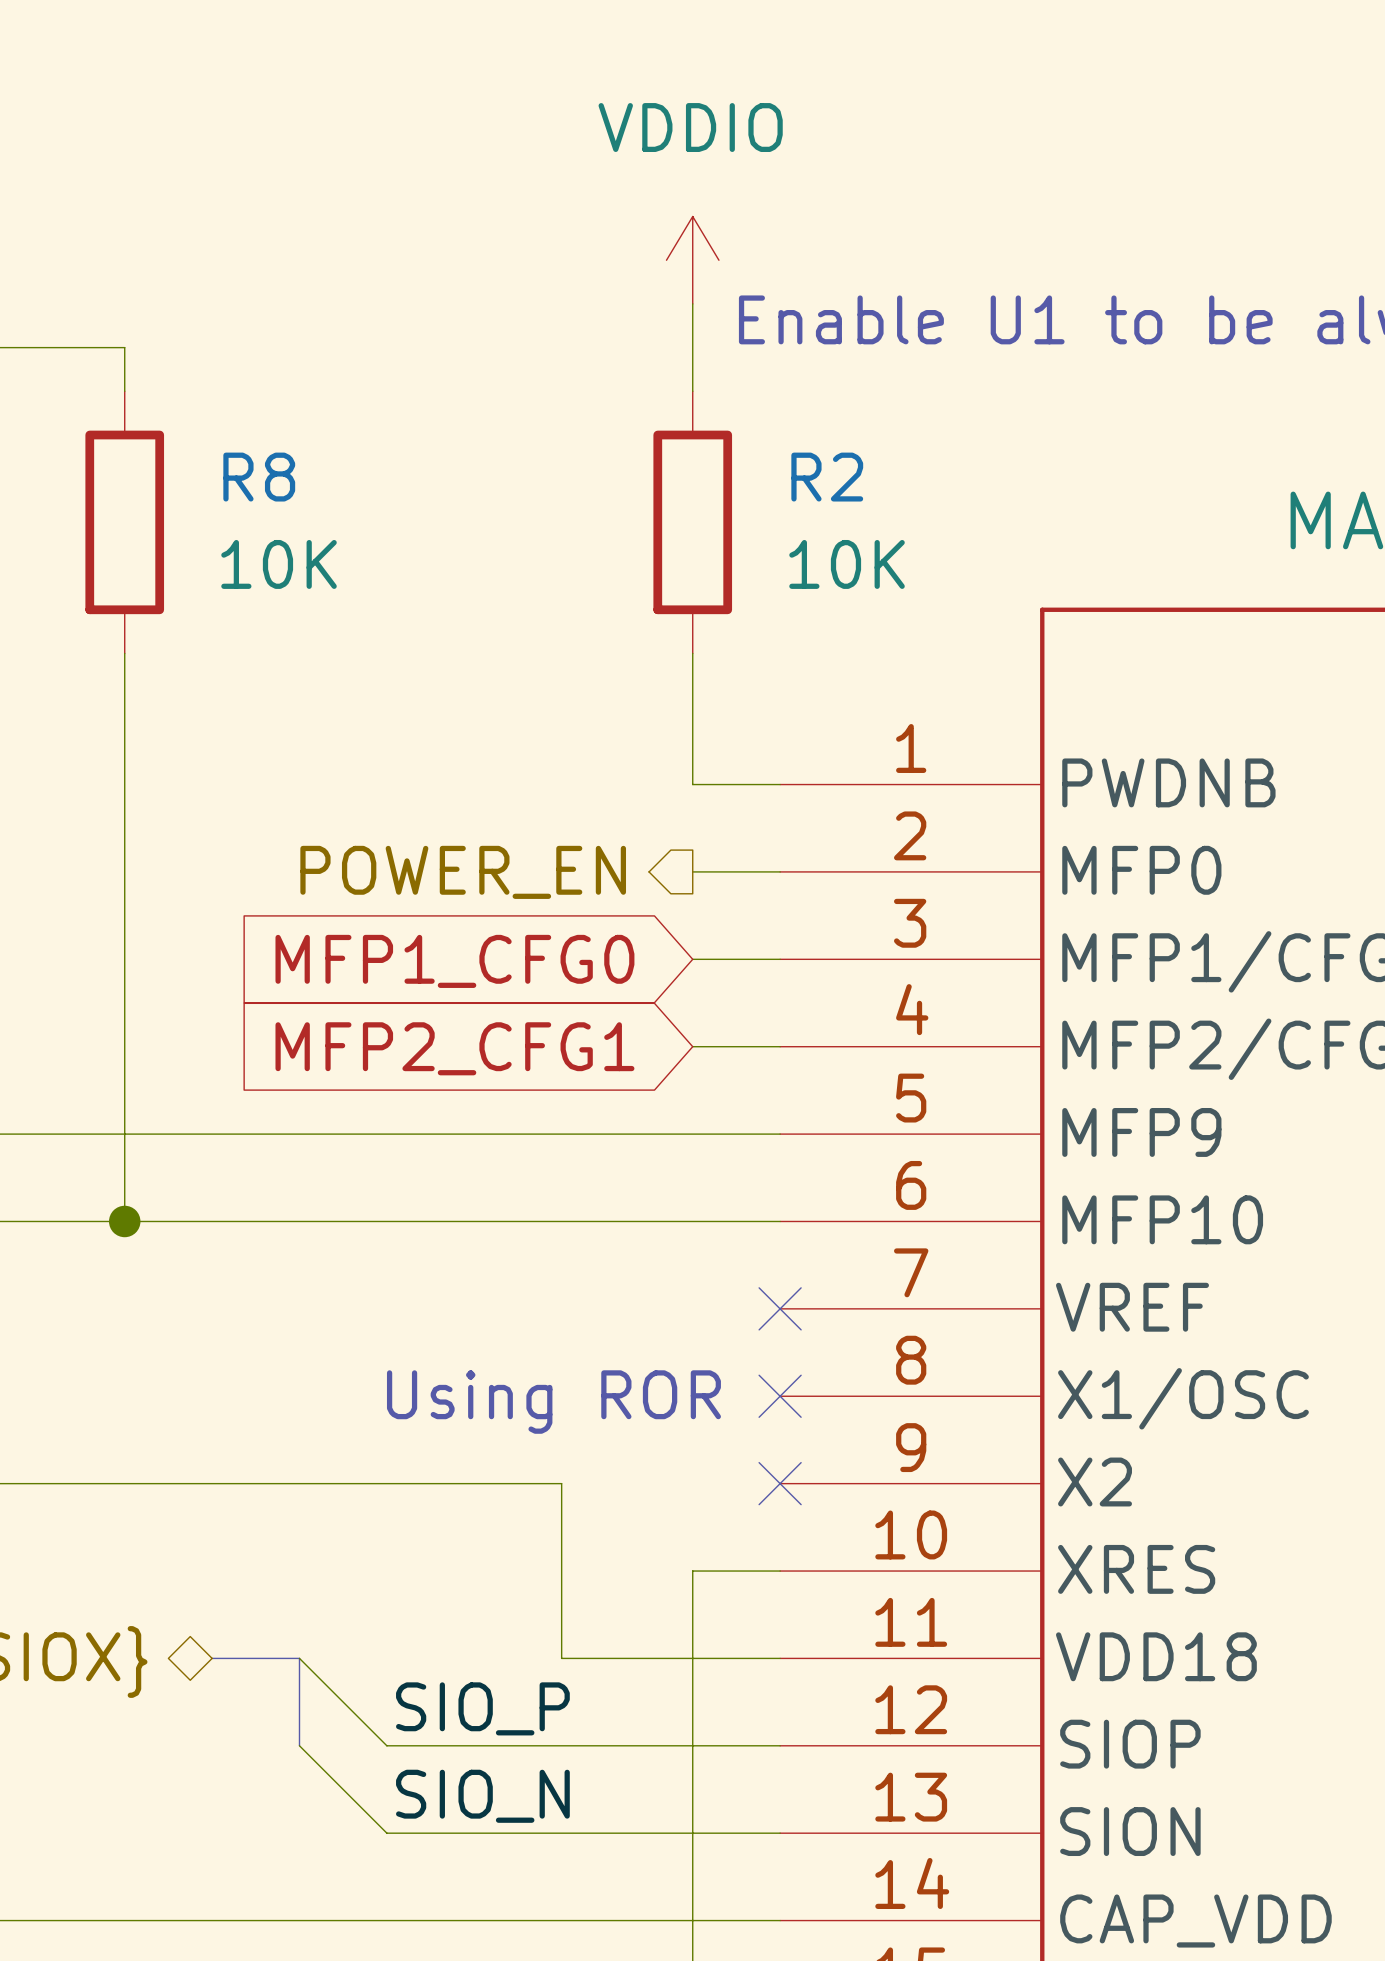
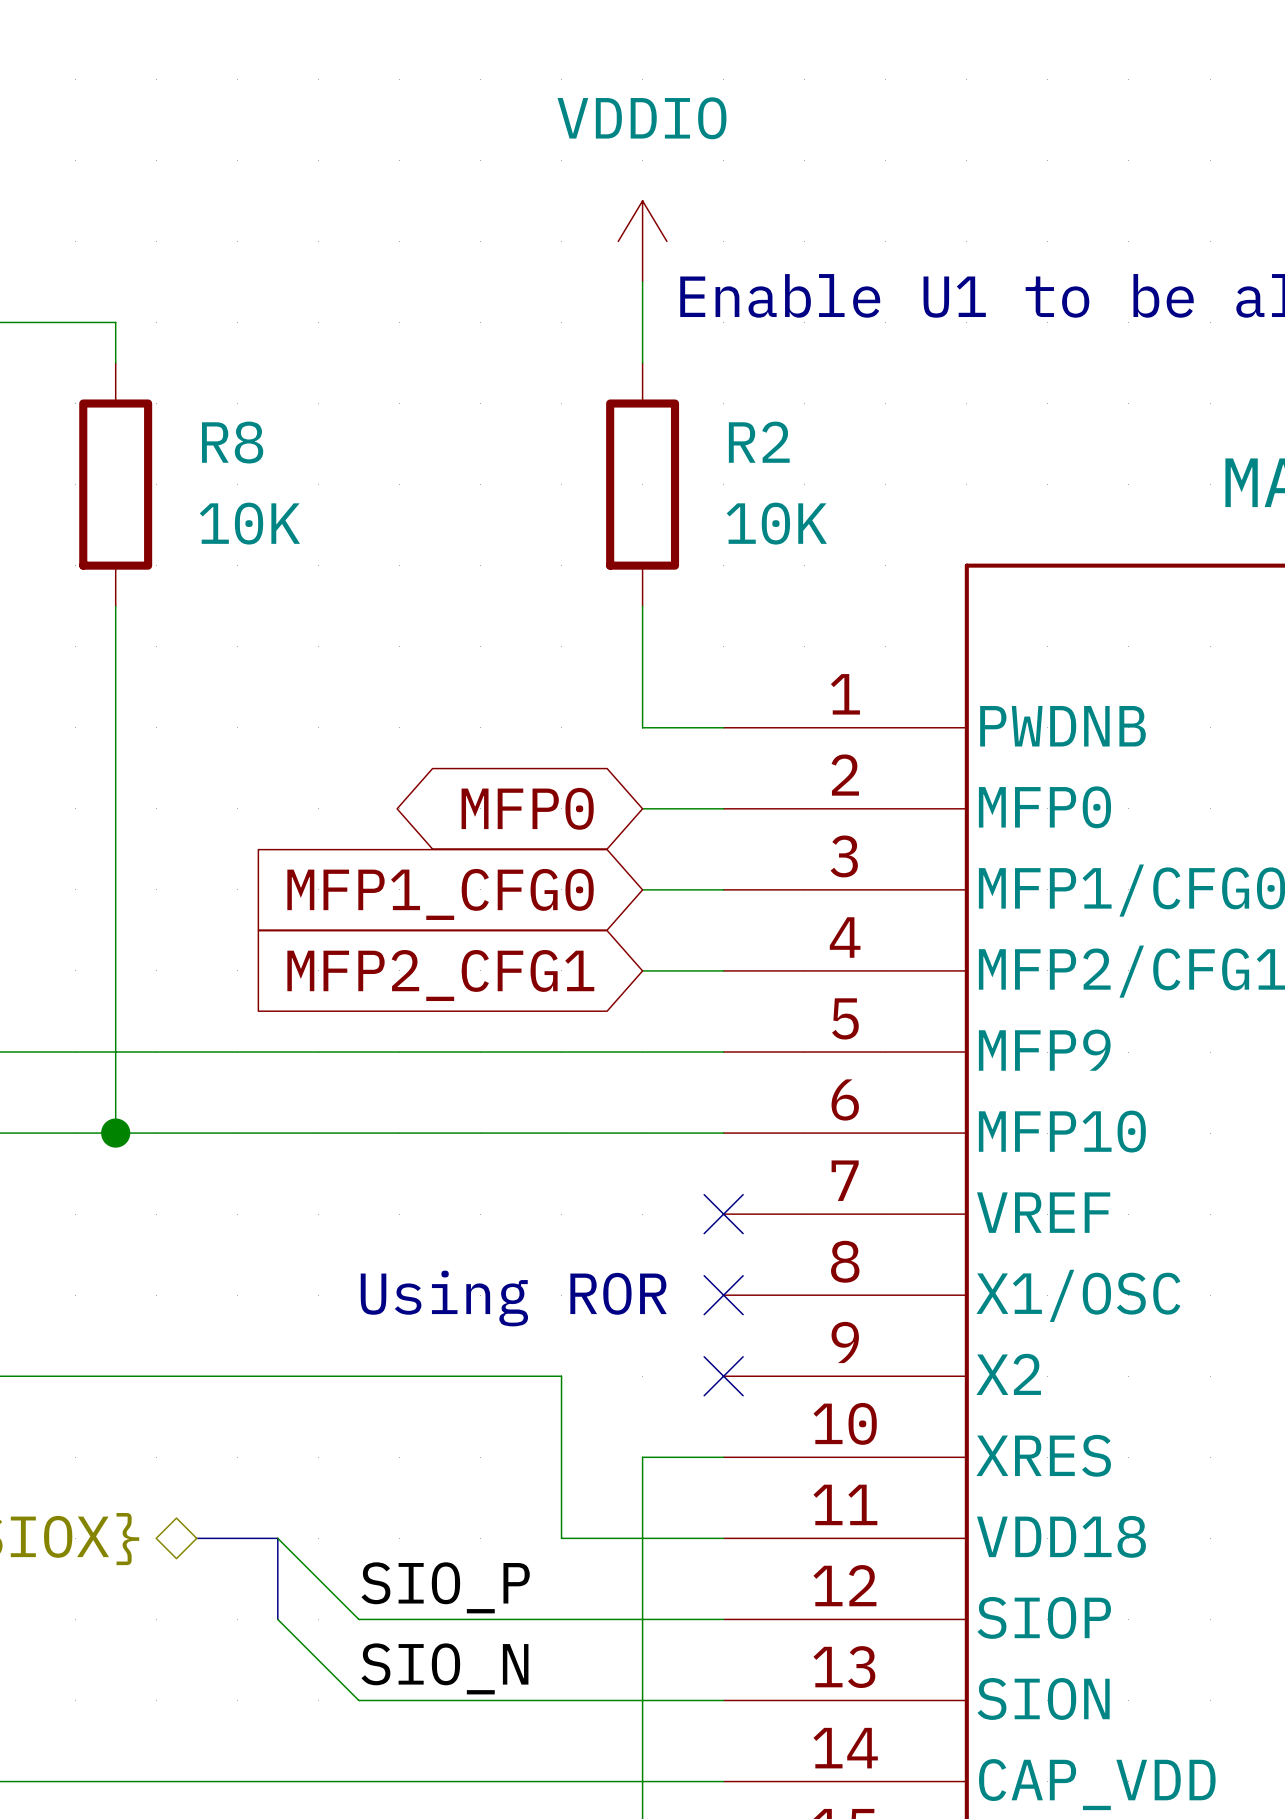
global label: none -> MFP0 (527, 808)
hierarchical label: POWER_EN (463, 872) -> none
wire: (561, 1483) (561, 1658) (605, 1658) -> (521, 1376) (561, 1376) (561, 1538)

